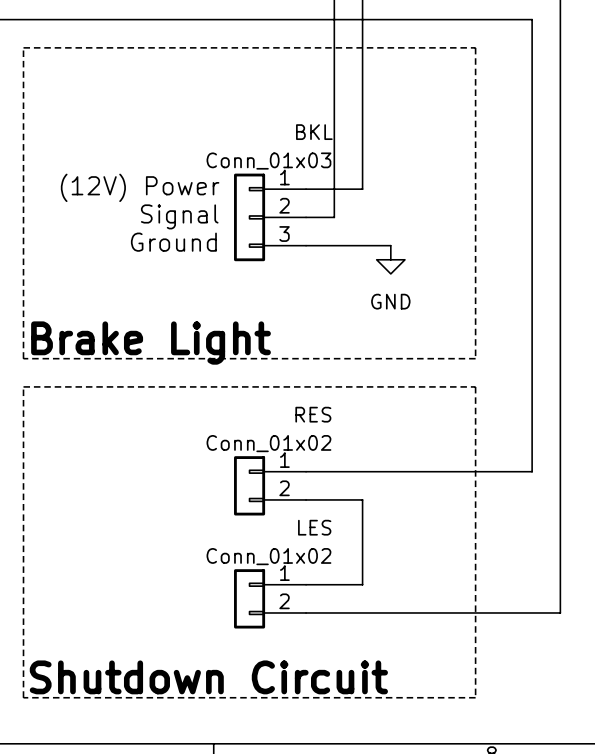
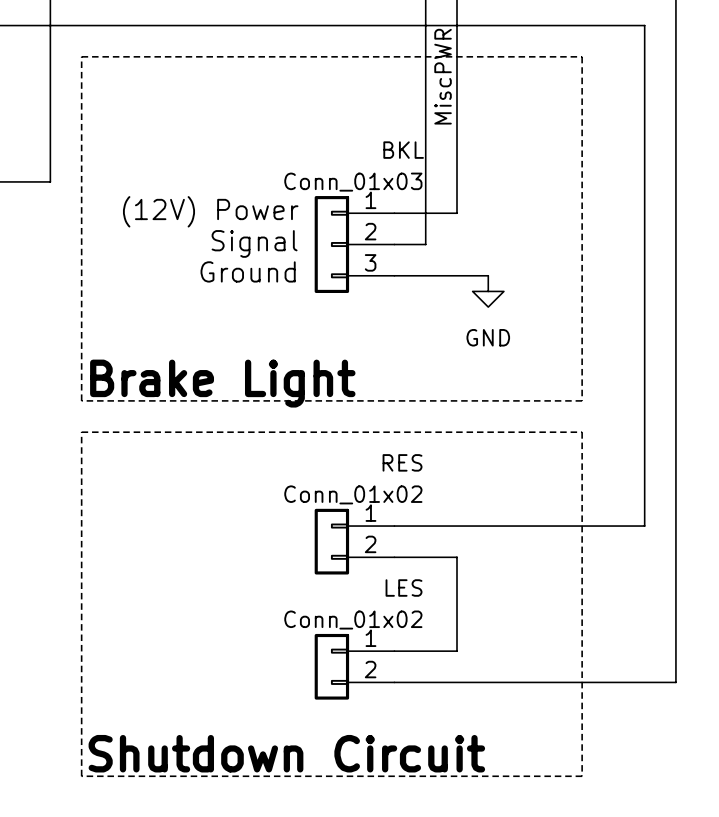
label: none -> MiscPWR (443, 76)

